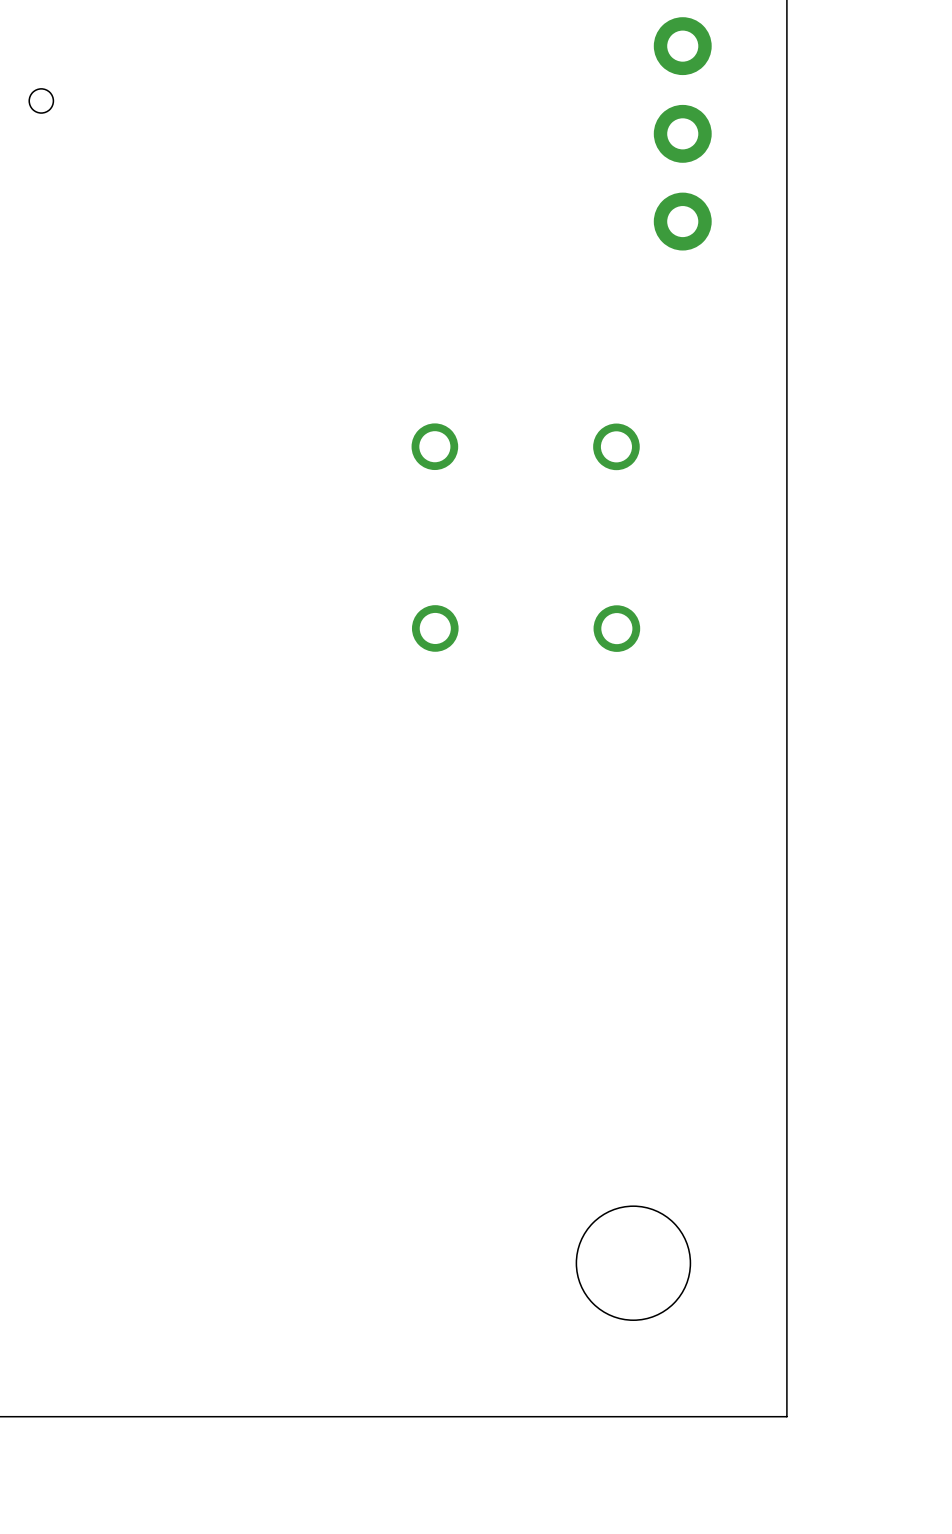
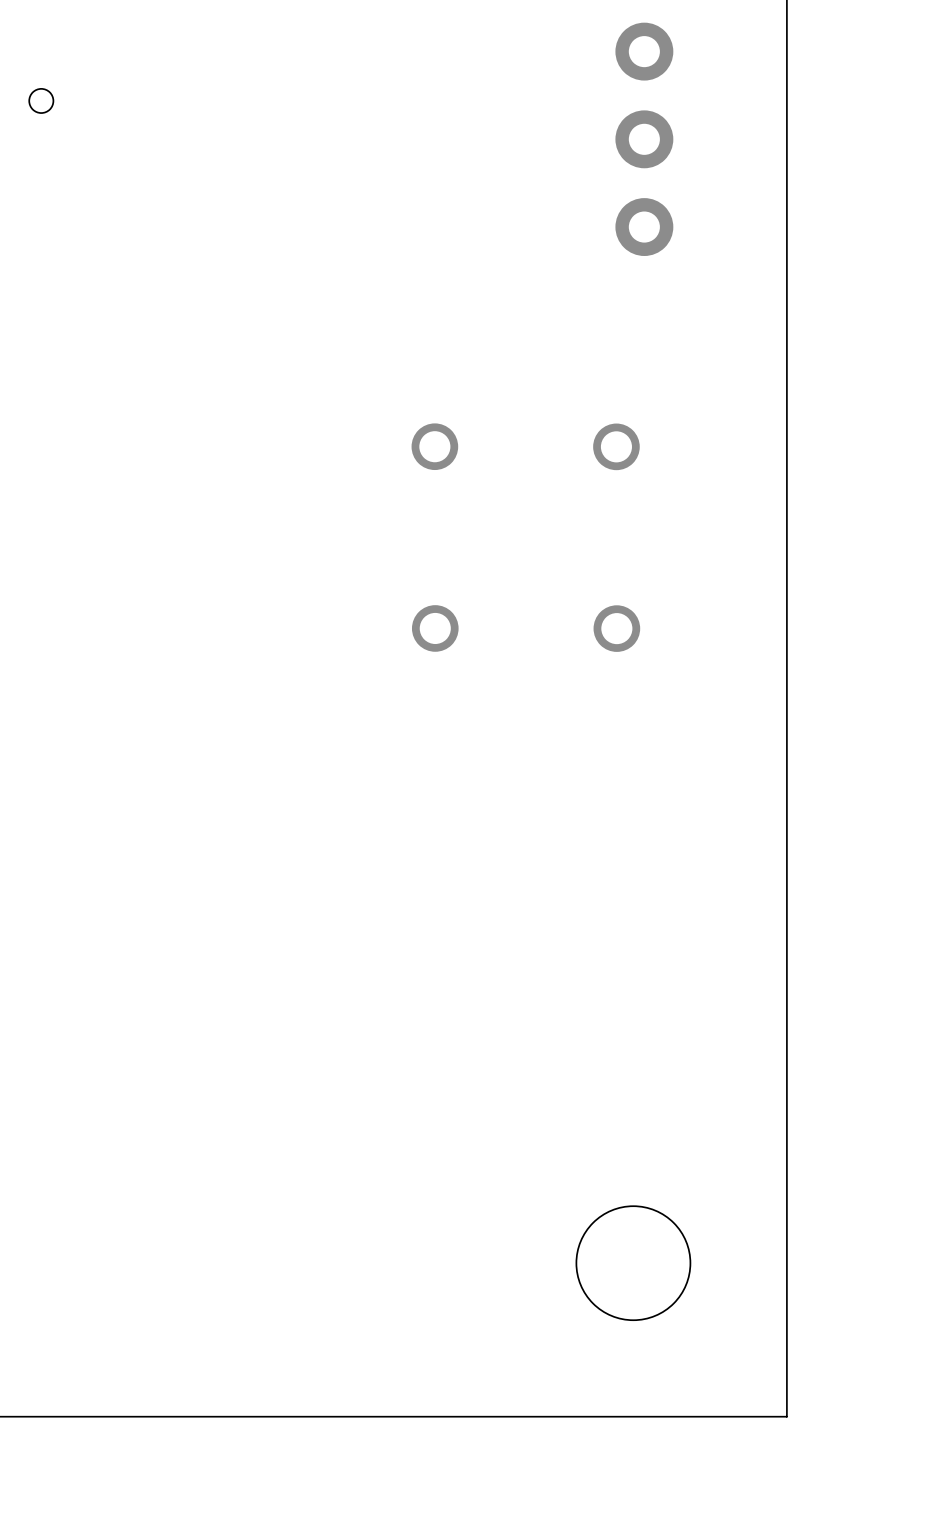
part position: (682, 133) -> (644, 139)

